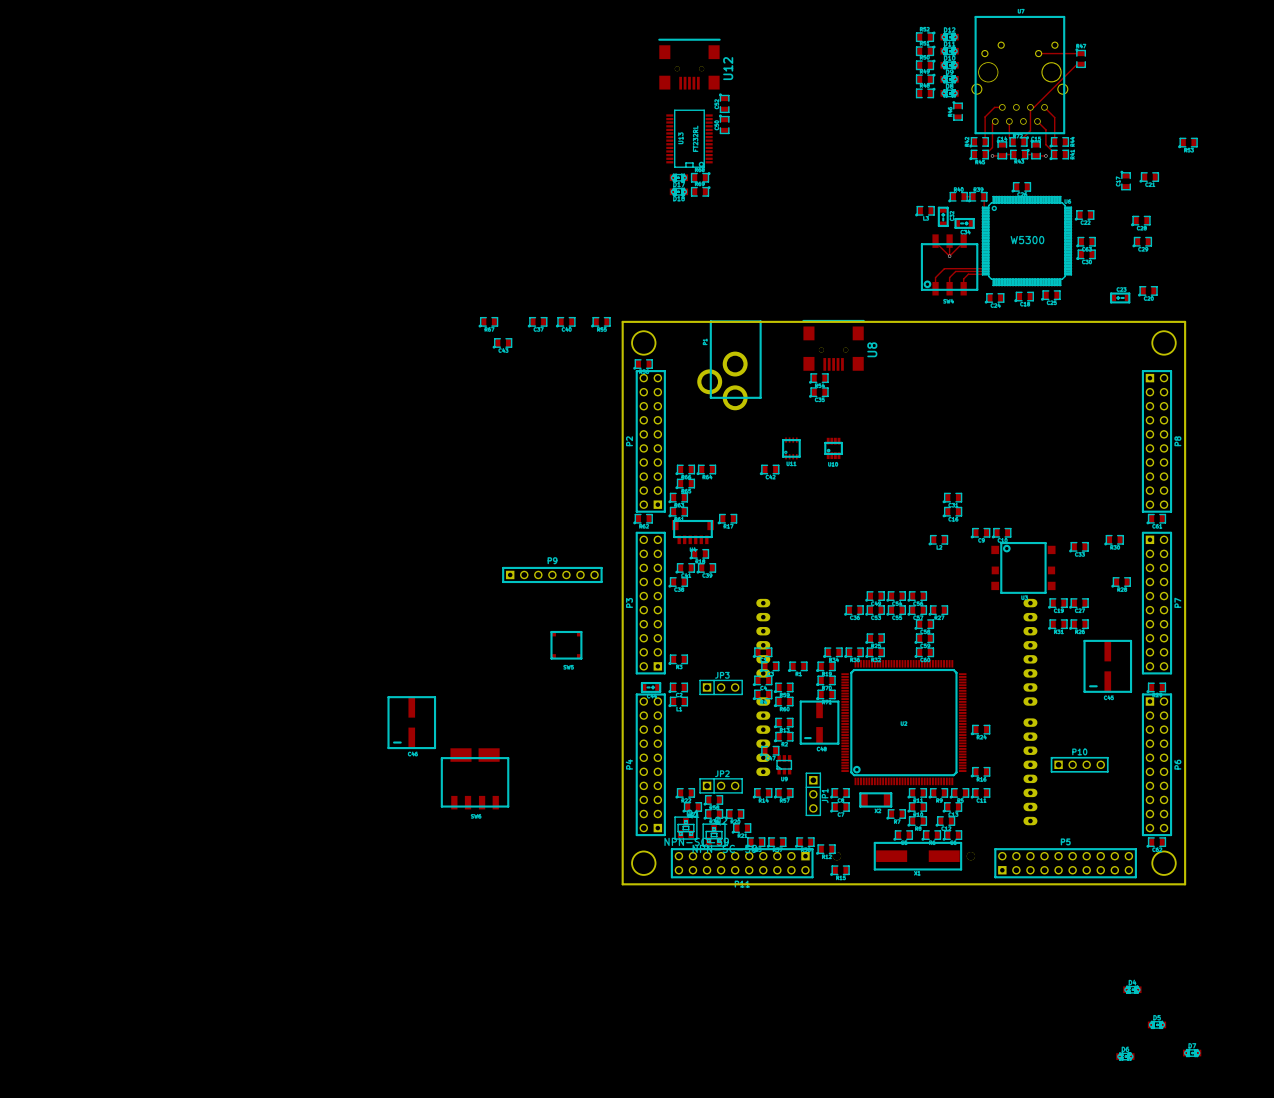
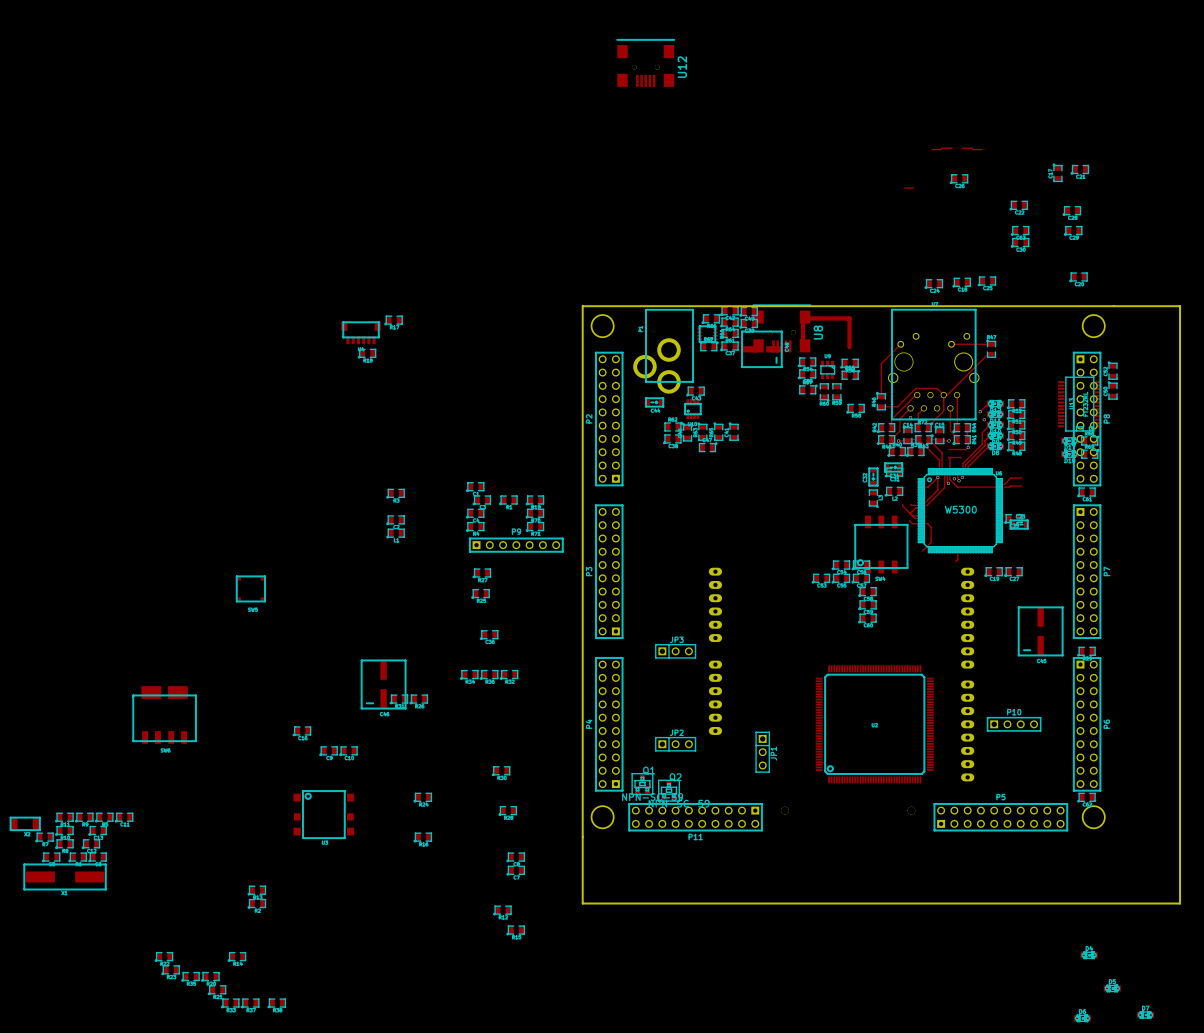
part rotation: 0° (925, 36) -> 180° (1016, 404)
part position: (925, 36) -> (1016, 404)
part rotation: 0° (949, 37) -> 180° (995, 403)
part position: (949, 37) -> (995, 403)
part rotation: 0° (925, 50) -> 180° (1016, 414)
part position: (925, 50) -> (1016, 414)
part rotation: 0° (949, 51) -> 180° (995, 414)
part position: (949, 51) -> (995, 414)
track: (1038, 53) (1081, 53) -> none
part position: (1080, 58) -> (991, 348)
part rotation: 0° (925, 64) -> 180° (1016, 425)
part position: (925, 64) -> (1016, 425)
track: (1081, 64) (1077, 64) (1034, 107) (1030, 107) (1030, 130) (1023, 137) (1023, 141) -> none
part rotation: 0° (949, 65) -> 180° (995, 425)
part position: (949, 65) -> (995, 425)
part position: (1019, 75) -> (933, 364)
part rotation: 0° (925, 78) -> 180° (1016, 435)
part position: (925, 78) -> (1016, 435)
part rotation: 0° (949, 79) -> 180° (995, 435)
part position: (949, 79) -> (995, 435)
part rotation: 0° (925, 93) -> 180° (1016, 446)
part position: (925, 93) -> (1016, 446)
part rotation: 0° (949, 93) -> 180° (995, 446)
part position: (949, 93) -> (995, 446)
part position: (724, 103) -> (1112, 370)
track: (1002, 107) (994, 107) (985, 116) (985, 141) -> none
track: (1044, 107) (1054, 117) (1054, 141) -> none
part position: (957, 110) -> (881, 401)
track: (995, 121) (992, 124) (992, 147) (985, 154) -> none
track: (1009, 121) (1009, 138) (1013, 141) -> none
track: (1037, 121) (1045, 129) (1045, 144) (1054, 154) -> none
part position: (724, 124) -> (1112, 390)
part position: (689, 138) -> (1079, 404)
part position: (1019, 141) -> (923, 427)
part position: (979, 142) -> (886, 427)
part position: (1059, 142) -> (961, 427)
part: (1187, 142) -> none
part position: (1001, 149) -> (907, 434)
part position: (1035, 149) -> (939, 434)
part position: (979, 154) -> (886, 439)
part position: (1019, 154) -> (924, 439)
part position: (1059, 154) -> (961, 439)
via: (992, 155) -> none
via: (1045, 155) -> none
part position: (678, 177) -> (1069, 440)
part position: (700, 177) -> (1090, 440)
part position: (678, 191) -> (1069, 454)
part position: (700, 191) -> (1090, 453)
track: (983, 196) (984, 207) -> none
part position: (958, 197) -> (896, 451)
part position: (977, 197) -> (915, 451)
part rotation: 0° (924, 211) -> 90° counterclockwise (873, 498)
part position: (924, 211) -> (873, 498)
part rotation: 0° (943, 216) -> 180° (873, 477)
part position: (943, 216) -> (873, 477)
part position: (964, 223) -> (893, 467)
track: (935, 241) (949, 256) -> none
track: (949, 241) (949, 256) -> none
track: (963, 241) (949, 256) -> none
part position: (1026, 241) -> (960, 510)
via: (949, 256) -> none
part position: (949, 264) -> (881, 544)
track: (984, 268) (944, 268) (935, 277) (935, 288) -> none
track: (984, 271) (955, 271) (949, 277) (949, 288) -> none
track: (984, 274) (968, 274) (963, 278) (963, 288) -> none
part position: (1120, 297) -> (1019, 524)
board edge: (1185, 321) (1185, 884) (622, 884) -> (1113, 306) (1180, 306) (1180, 903) (582, 903) (582, 837)
part rotation: 0° (488, 322) -> 180° (709, 346)
part position: (488, 322) -> (709, 346)
part position: (537, 322) -> (729, 346)
part rotation: 0° (565, 322) -> 90° clockwise (687, 432)
part position: (565, 322) -> (687, 432)
part rotation: 0° (600, 322) -> 180° (850, 374)
part position: (600, 322) -> (850, 374)
part position: (502, 343) -> (695, 391)
track: none -> (900, 344) (881, 363) (881, 396)
track: none -> (951, 344) (991, 344)
part position: (643, 364) -> (849, 363)
part position: (729, 365) -> (663, 351)
track: none -> (803, 347) (803, 318) (849, 318) (849, 347)
track: none -> (991, 354) (987, 354) (947, 395) (943, 395)
part position: (818, 378) -> (807, 362)
part position: (818, 392) -> (807, 374)
track: none -> (917, 395) (891, 419) (891, 427)
track: none -> (943, 395) (937, 388) (915, 388) (897, 406) (881, 406)
track: none -> (943, 395) (943, 411) (928, 427)
track: none -> (957, 395) (957, 427)
track: none -> (990, 403) (980, 411)
track: none -> (910, 408) (899, 418) (899, 430) (891, 439)
track: none -> (923, 408) (918, 413) (918, 427)
track: none -> (950, 408) (950, 430) (957, 439)
via: none -> (980, 411)
via: none -> (910, 417)
via: none -> (984, 419)
track: none -> (990, 425) (982, 432) (982, 444) (962, 463) (962, 470)
part rotation: 0° (791, 448) -> 90° counterclockwise (707, 334)
part position: (791, 448) -> (707, 334)
part position: (833, 448) -> (692, 409)
track: none -> (967, 427) (968, 447) (966, 449) (949, 449)
track: none -> (990, 435) (984, 440) (984, 445) (965, 464) (965, 470)
track: none -> (898, 440) (918, 439) (939, 460) (939, 470)
via: none -> (898, 440)
track: none -> (949, 440) (928, 439) (942, 452) (942, 470)
via: none -> (949, 440)
part position: (685, 469) -> (710, 319)
part position: (706, 469) -> (729, 322)
part position: (769, 469) -> (729, 311)
track: none -> (990, 446) (968, 466) (968, 470)
via: none -> (968, 447)
track: none -> (961, 457) (949, 457) (949, 479) (957, 487) (1022, 486)
part rotation: 0° (685, 483) -> 90° clockwise (718, 431)
part position: (685, 483) -> (718, 431)
track: none -> (944, 470) (944, 487) (927, 505) (910, 504)
track: none -> (947, 470) (948, 483)
track: none -> (957, 470) (959, 480)
part rotation: 0° (678, 497) -> 90° clockwise (702, 431)
part position: (678, 497) -> (702, 431)
via: none -> (937, 477)
via: none -> (962, 477)
track: none -> (1022, 478) (1010, 478) (1004, 484) (1000, 484)
via: none -> (954, 478)
via: none -> (959, 480)
via: none -> (948, 483)
part position: (678, 512) -> (729, 333)
part position: (952, 512) -> (301, 731)
track: none -> (920, 487) (928, 487) (937, 477) (937, 490) (925, 502) (920, 502)
part rotation: 0° (643, 519) -> 180° (673, 426)
part position: (643, 519) -> (673, 426)
part position: (727, 519) -> (393, 320)
part position: (692, 532) -> (361, 332)
track: none -> (902, 504) (902, 505) (915, 518) (920, 518) (920, 515) (912, 515)
part position: (980, 533) -> (328, 751)
part position: (1001, 533) -> (348, 751)
track: none -> (920, 508) (915, 508) (909, 512)
part position: (938, 540) -> (893, 491)
part position: (1114, 540) -> (501, 771)
track: none -> (909, 520) (912, 523) (927, 523) (931, 527) (931, 542) (922, 551)
part position: (699, 554) -> (367, 353)
part position: (1023, 567) -> (323, 814)
part rotation: 0° (685, 568) -> 90° clockwise (733, 431)
part position: (685, 568) -> (733, 431)
part position: (706, 568) -> (748, 323)
track: none -> (957, 550) (957, 559) (955, 561)
part position: (678, 582) -> (672, 439)
part position: (1121, 582) -> (507, 810)
part position: (875, 596) -> (748, 311)
part position: (853, 610) -> (489, 635)
part position: (938, 610) -> (481, 573)
part position: (1057, 624) -> (398, 699)
part position: (1078, 624) -> (418, 699)
part position: (875, 638) -> (480, 593)
part position: (566, 645) -> (250, 588)
part position: (762, 652) -> (475, 487)
part position: (832, 652) -> (469, 674)
part position: (853, 652) -> (489, 674)
part position: (875, 652) -> (509, 674)
part position: (678, 659) -> (395, 493)
part position: (769, 666) -> (481, 500)
part position: (797, 666) -> (508, 500)
part position: (825, 666) -> (534, 500)
part position: (762, 680) -> (475, 513)
part position: (825, 680) -> (534, 513)
part position: (651, 687) -> (654, 402)
part position: (678, 687) -> (395, 520)
part rotation: 0° (783, 687) -> 90° counterclockwise (837, 392)
part position: (783, 687) -> (837, 392)
part position: (762, 694) -> (475, 526)
part position: (825, 694) -> (534, 526)
part position: (678, 701) -> (395, 533)
part rotation: 0° (783, 701) -> 90° counterclockwise (824, 392)
part position: (783, 701) -> (824, 392)
part position: (783, 722) -> (256, 890)
part rotation: 0° (819, 722) -> 90° counterclockwise (761, 349)
part position: (819, 722) -> (761, 349)
part position: (903, 722) -> (874, 724)
part position: (980, 729) -> (422, 797)
part position: (783, 737) -> (256, 903)
part rotation: 0° (769, 751) -> 180° (708, 447)
part position: (769, 751) -> (708, 447)
part rotation: 0° (784, 764) -> 180° (827, 369)
part position: (784, 764) -> (827, 369)
part position: (980, 772) -> (422, 837)
part position: (475, 778) -> (164, 715)
part position: (685, 793) -> (163, 956)
part position: (762, 793) -> (236, 956)
part rotation: 0° (783, 793) -> 180° (808, 389)
part position: (783, 793) -> (808, 389)
part position: (839, 793) -> (515, 857)
part position: (917, 793) -> (64, 817)
part position: (938, 793) -> (84, 817)
part position: (959, 793) -> (104, 817)
part position: (980, 793) -> (124, 817)
part position: (875, 799) -> (25, 823)
part position: (713, 800) -> (855, 408)
part position: (692, 807) -> (170, 970)
part position: (839, 807) -> (515, 870)
part position: (917, 807) -> (64, 830)
part position: (952, 807) -> (97, 830)
part position: (713, 814) -> (190, 976)
part position: (734, 814) -> (210, 976)
part position: (896, 814) -> (44, 837)
part position: (917, 821) -> (64, 844)
part position: (945, 821) -> (90, 844)
part position: (741, 828) -> (217, 990)
part position: (903, 835) -> (51, 857)
part position: (931, 835) -> (77, 857)
part position: (952, 835) -> (97, 857)
part position: (755, 842) -> (230, 1003)
part position: (776, 842) -> (250, 1003)
part position: (804, 842) -> (276, 1003)
part position: (825, 849) -> (502, 910)
part position: (917, 856) -> (65, 876)
part position: (839, 870) -> (515, 930)
part position: (1132, 989) -> (1089, 955)
part position: (1157, 1024) -> (1112, 988)
part position: (1192, 1053) -> (1145, 1015)
part position: (1125, 1056) -> (1082, 1018)

